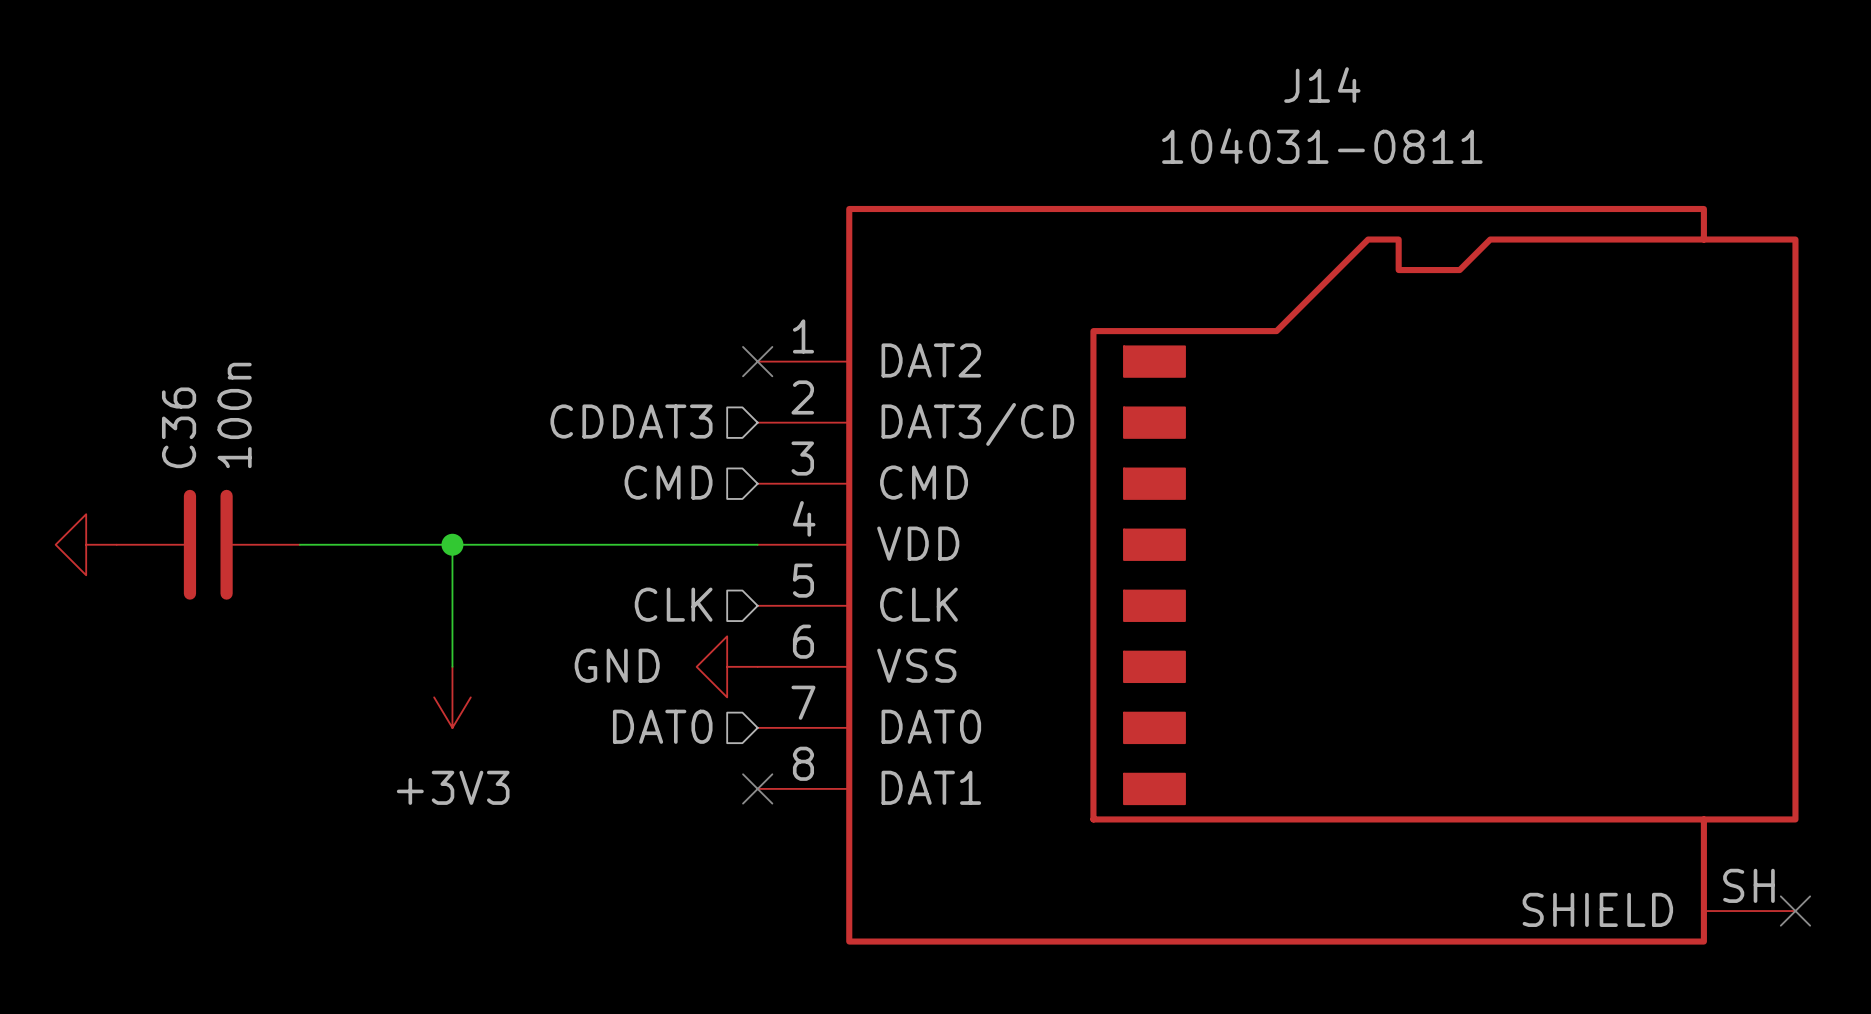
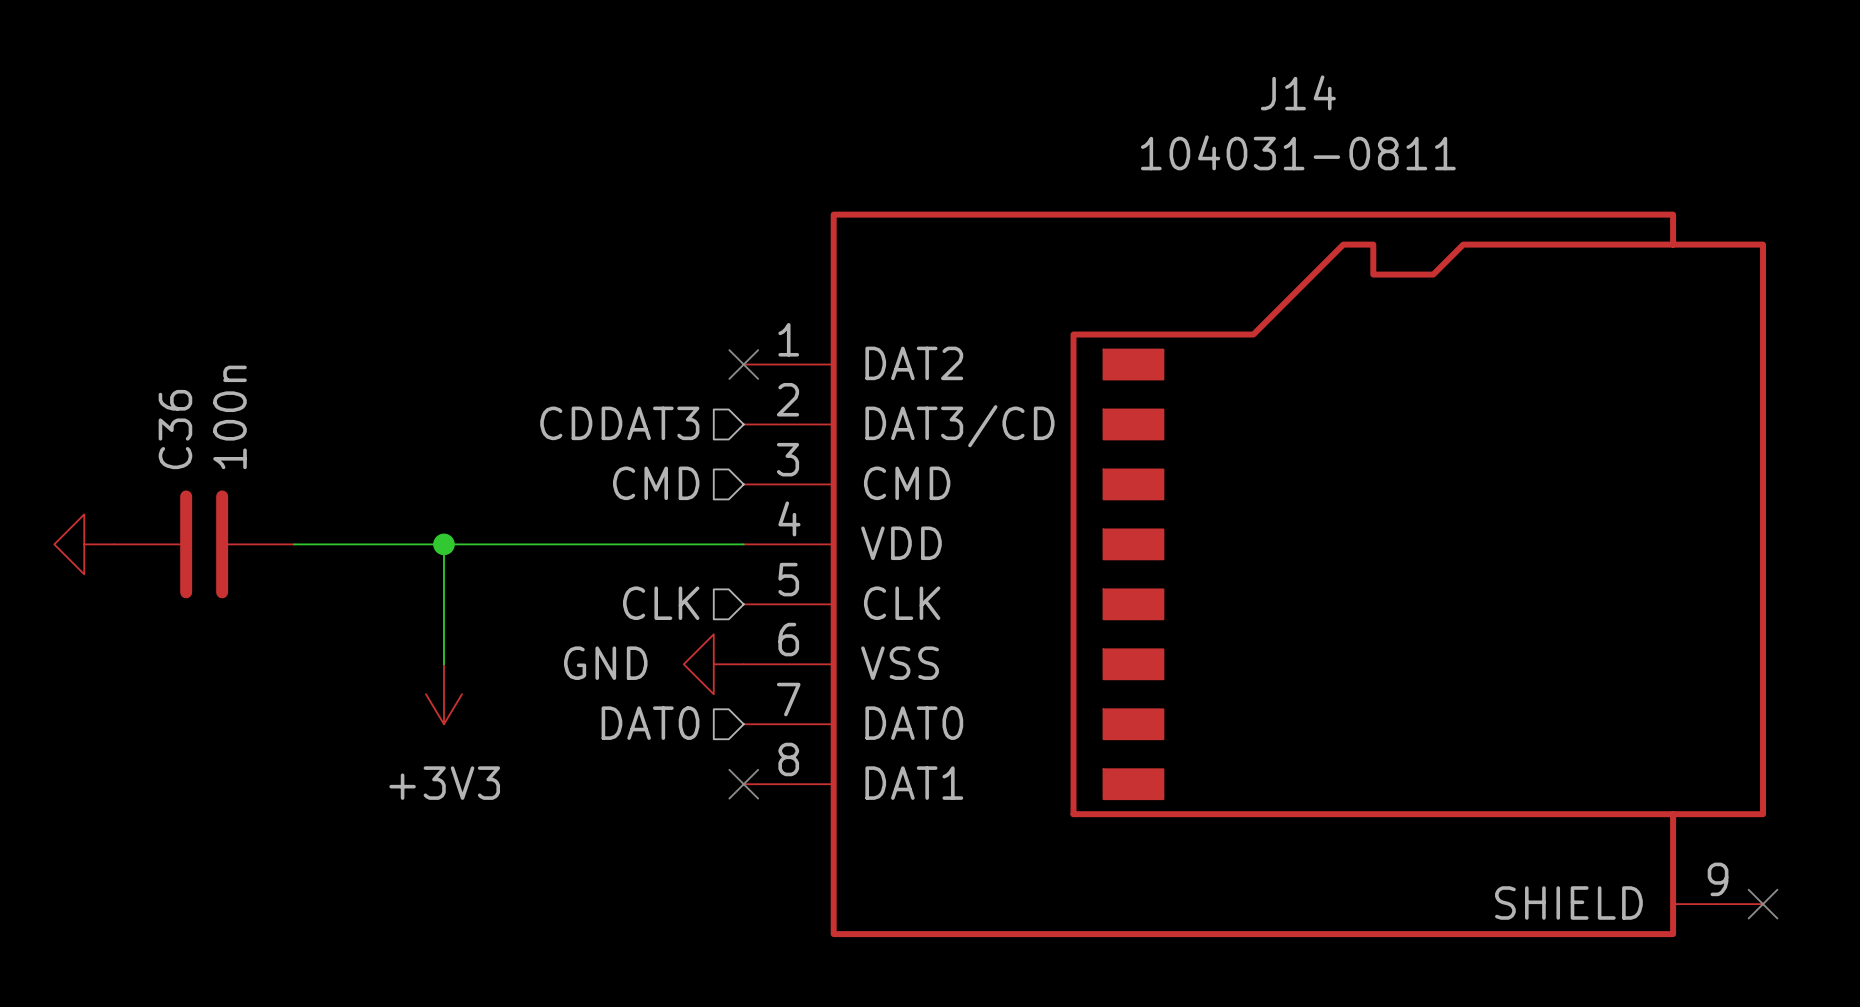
J14 pin number: SH (1748, 885) -> 9 (1718, 879)

